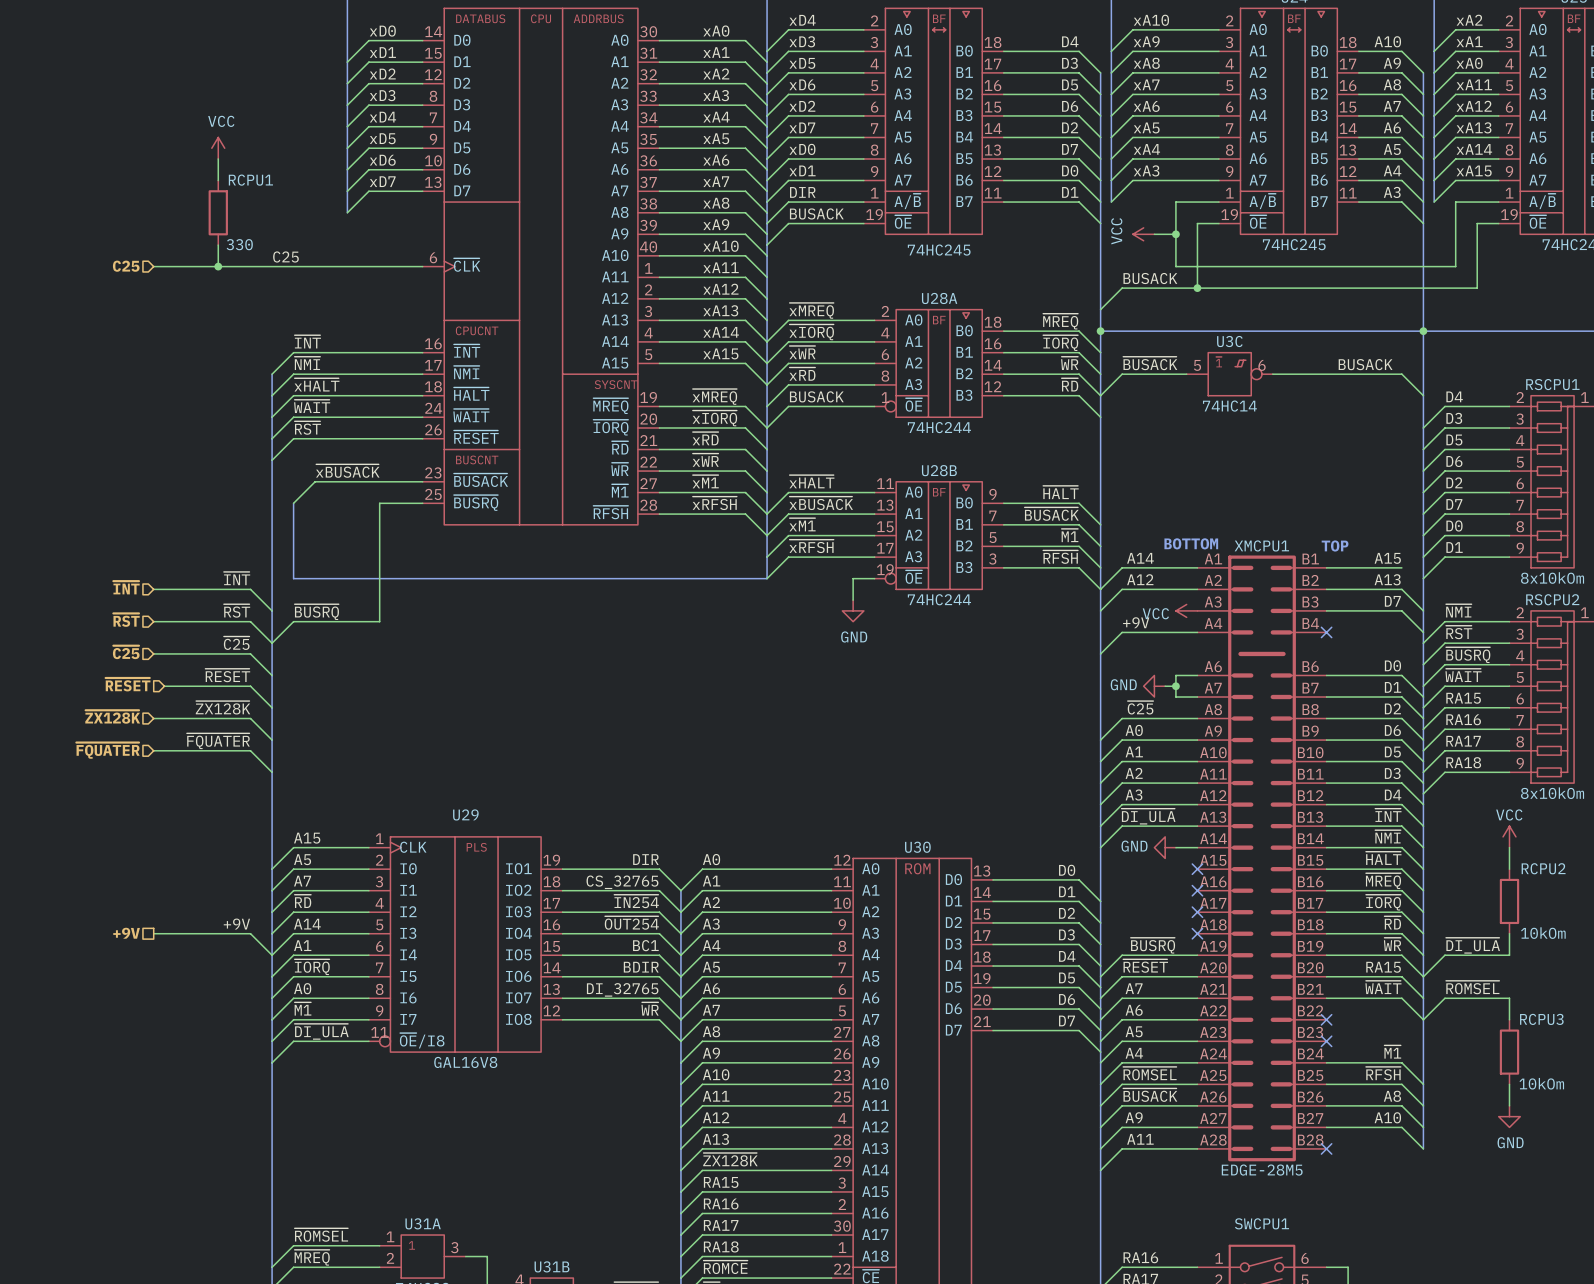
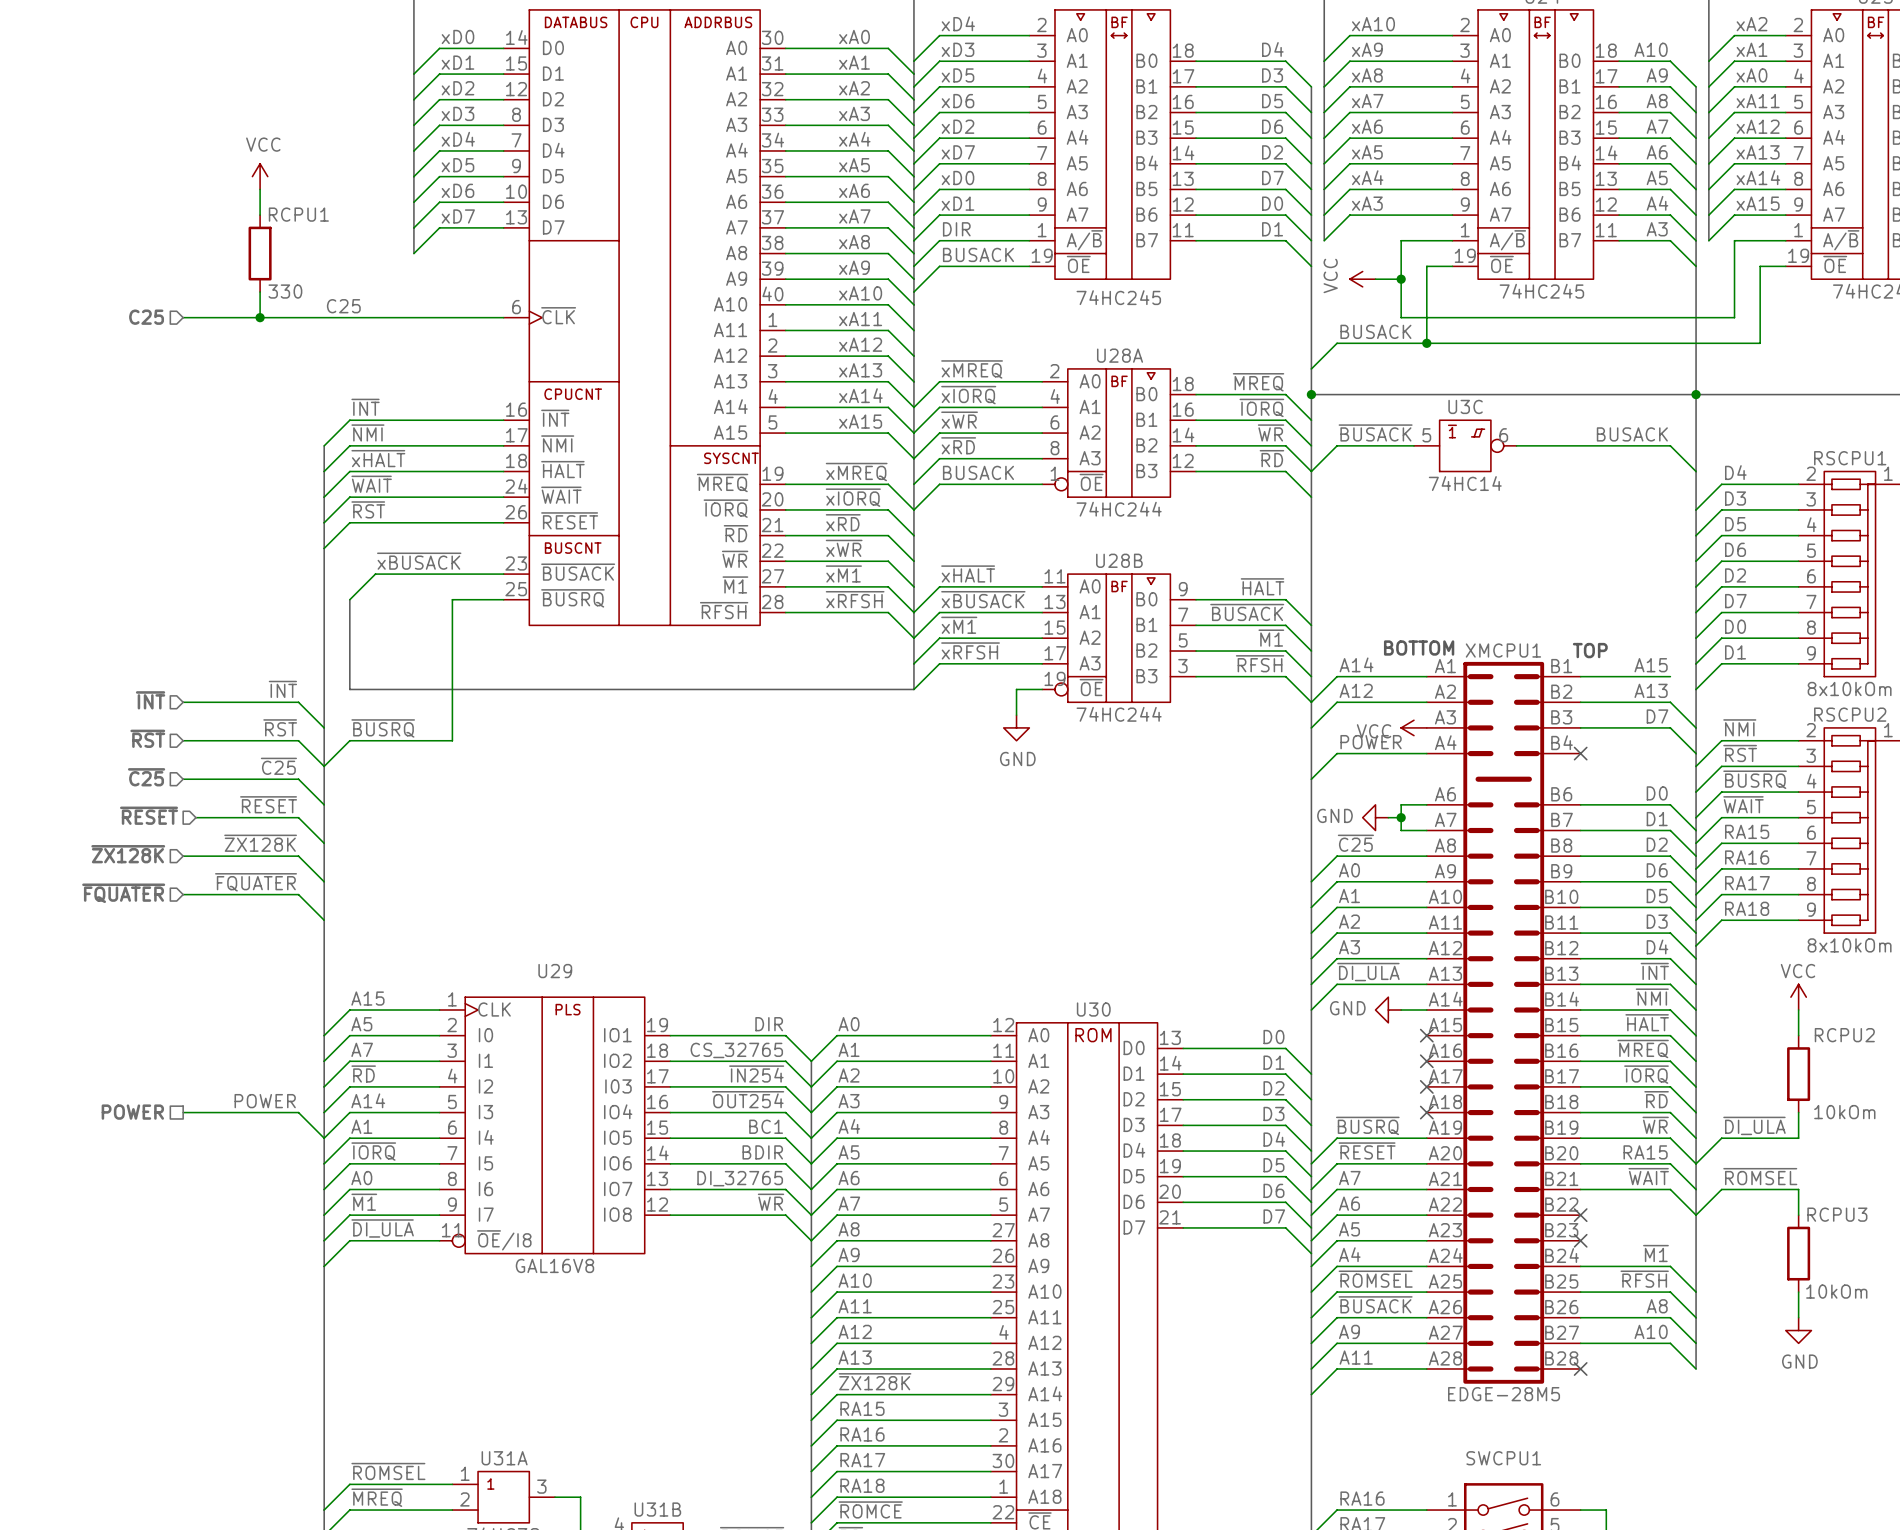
label: +9V (1136, 622) -> POWER (1371, 742)
label: +9V (236, 924) -> POWER (265, 1101)
hierarchical label: +9V (126, 933) -> POWER (132, 1112)

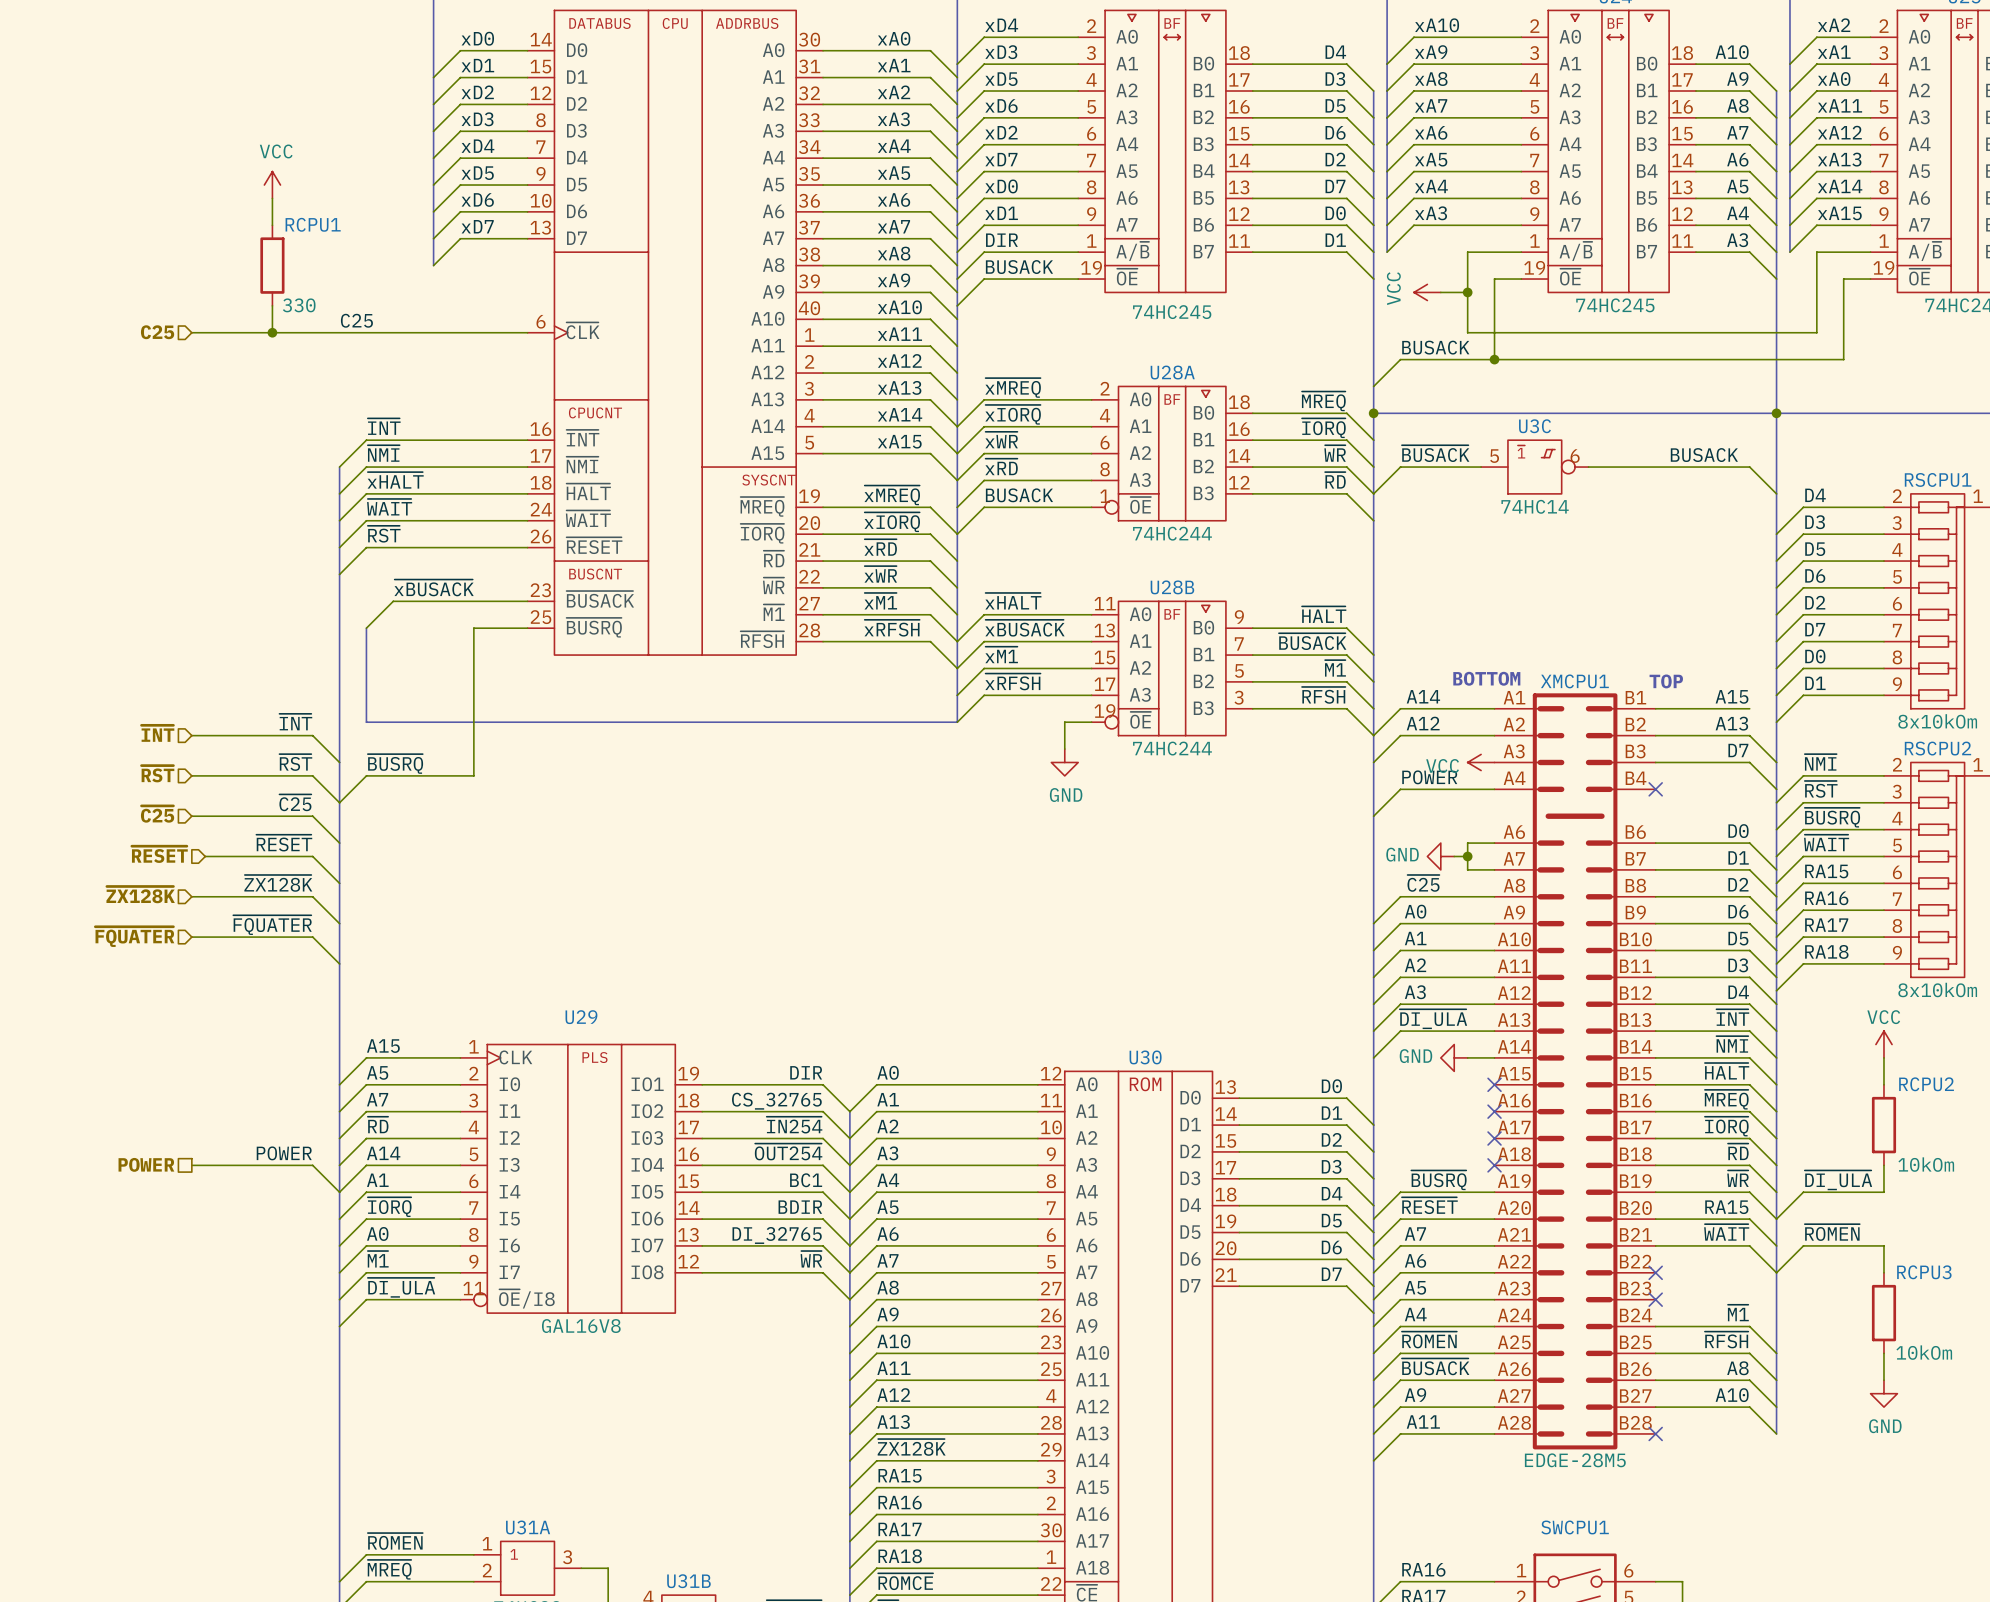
label: ~{ROMSEL} (1760, 1176) -> ~{ROMEN} (1832, 1232)
label: ~{ROMSEL} (1375, 1279) -> ~{ROMEN} (1429, 1339)
label: ~{ROMSEL} (388, 1471) -> ~{ROMEN} (395, 1541)

